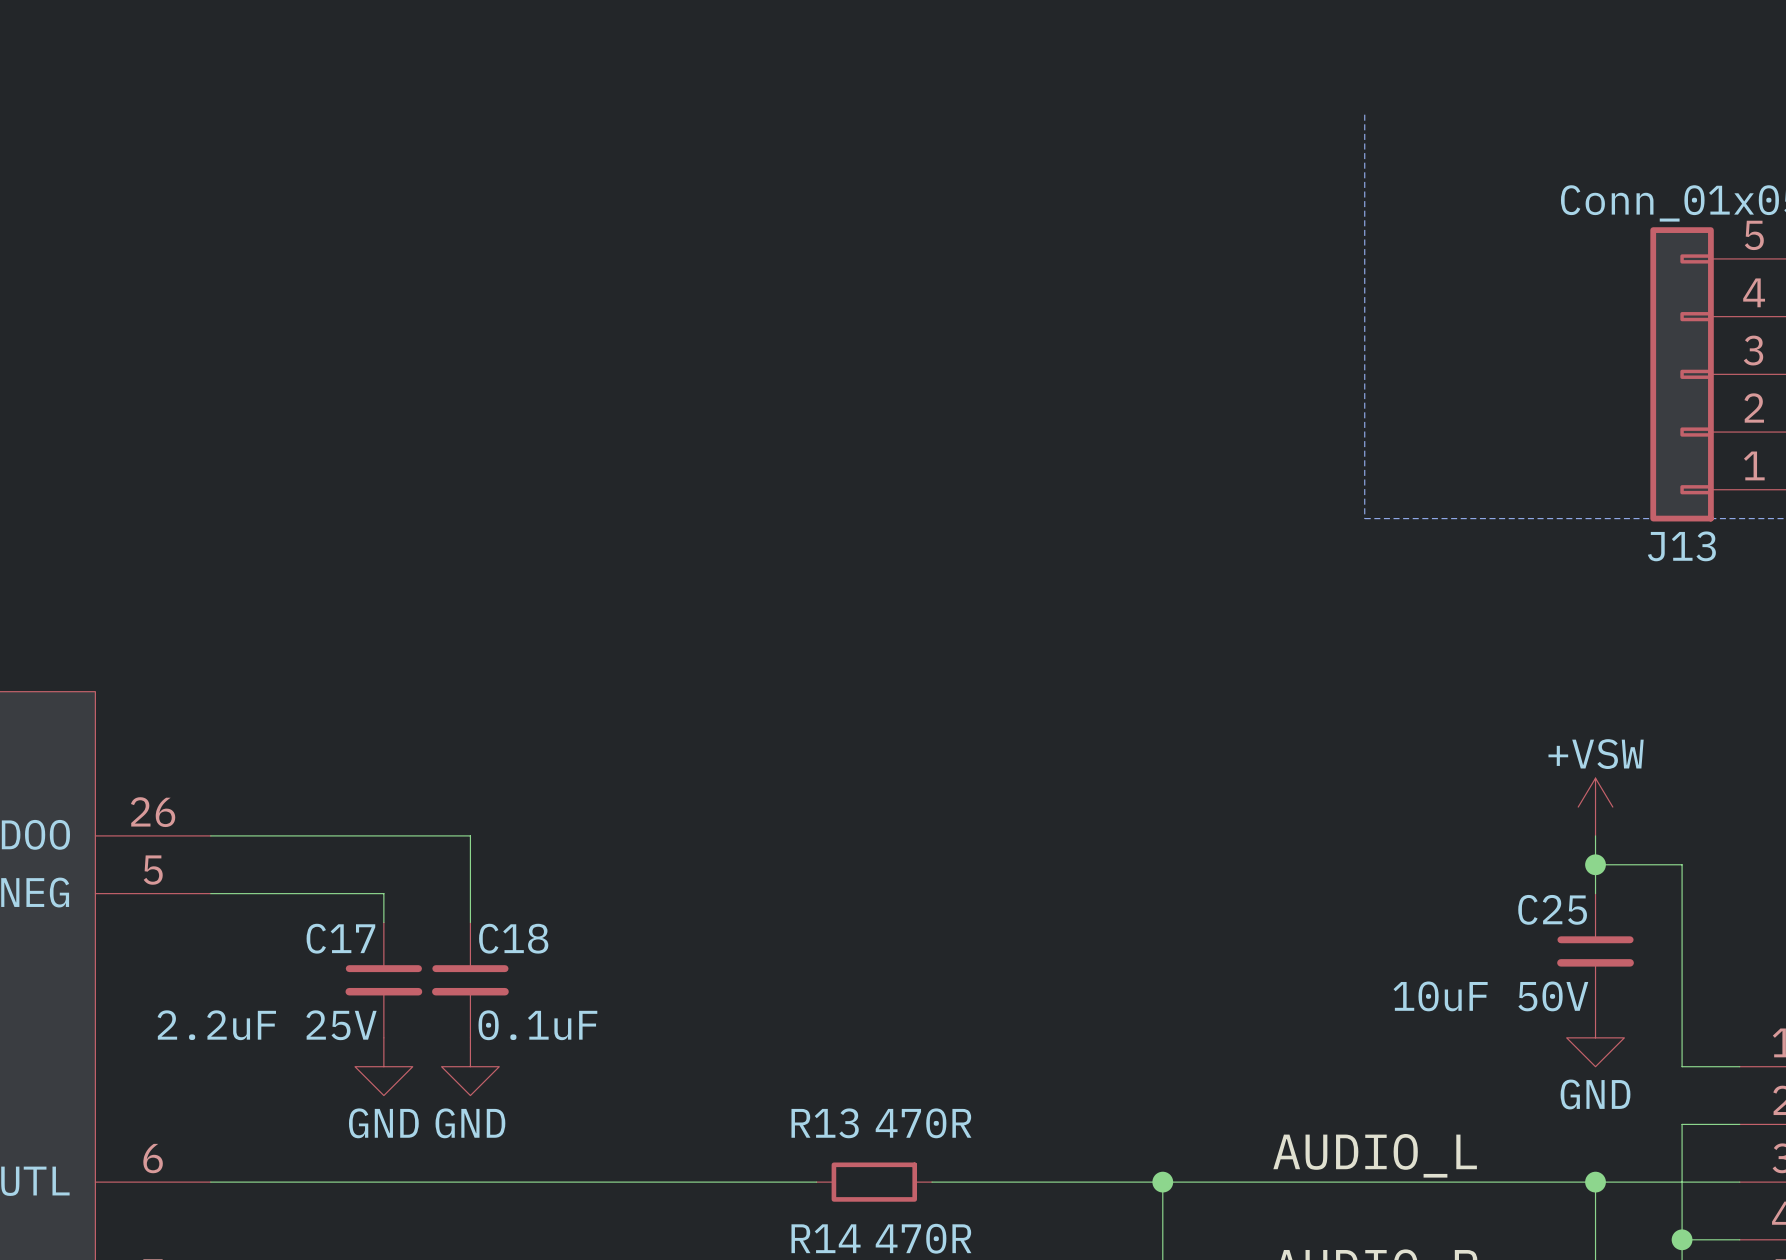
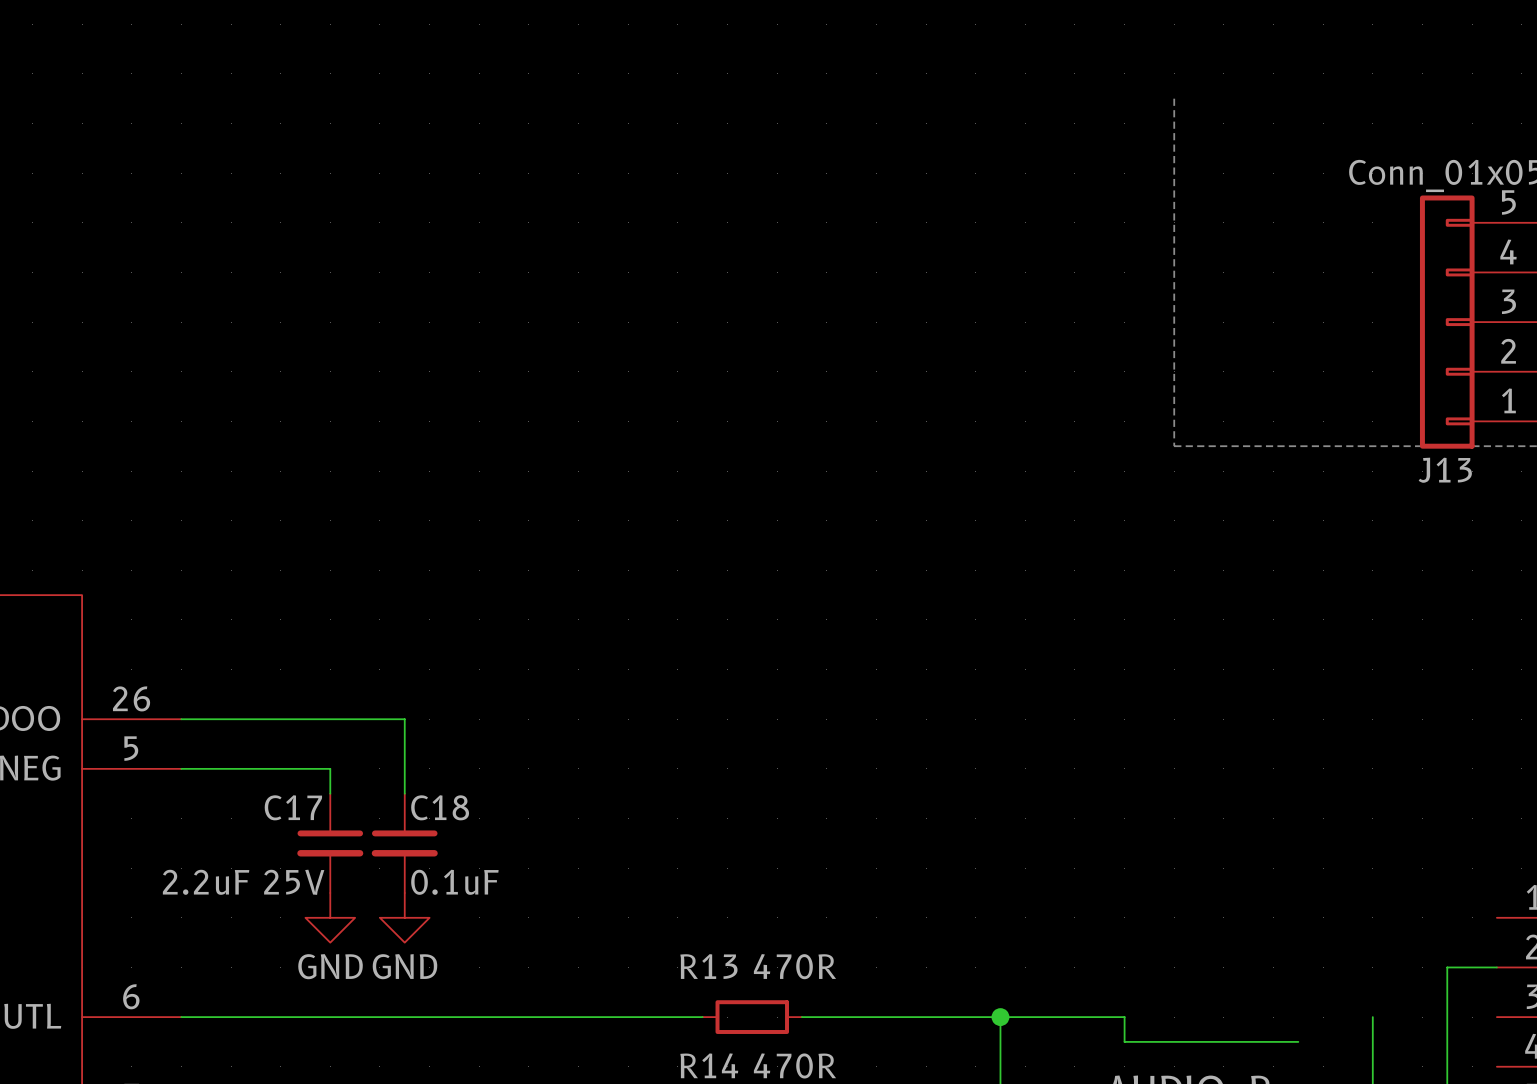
power symbol: +VSW (1595, 807) -> none
wire: (1595, 835) (1595, 893) -> none
wire: (1595, 864) (1682, 864) (1682, 1066) (1739, 1066) -> none
junction: (1595, 864) -> none
C25: 10uF 50V (1595, 951) -> none
power symbol: GND (1595, 1037) -> none
label: AUDIO_L (1375, 1155) -> none
wire: (1307, 1182) (1739, 1182) -> (1124, 1017) (1124, 1041) (1298, 1041)
junction: (1595, 1182) -> none
wire: (1682, 1239) (1739, 1239) -> none
junction: (1682, 1239) -> none

